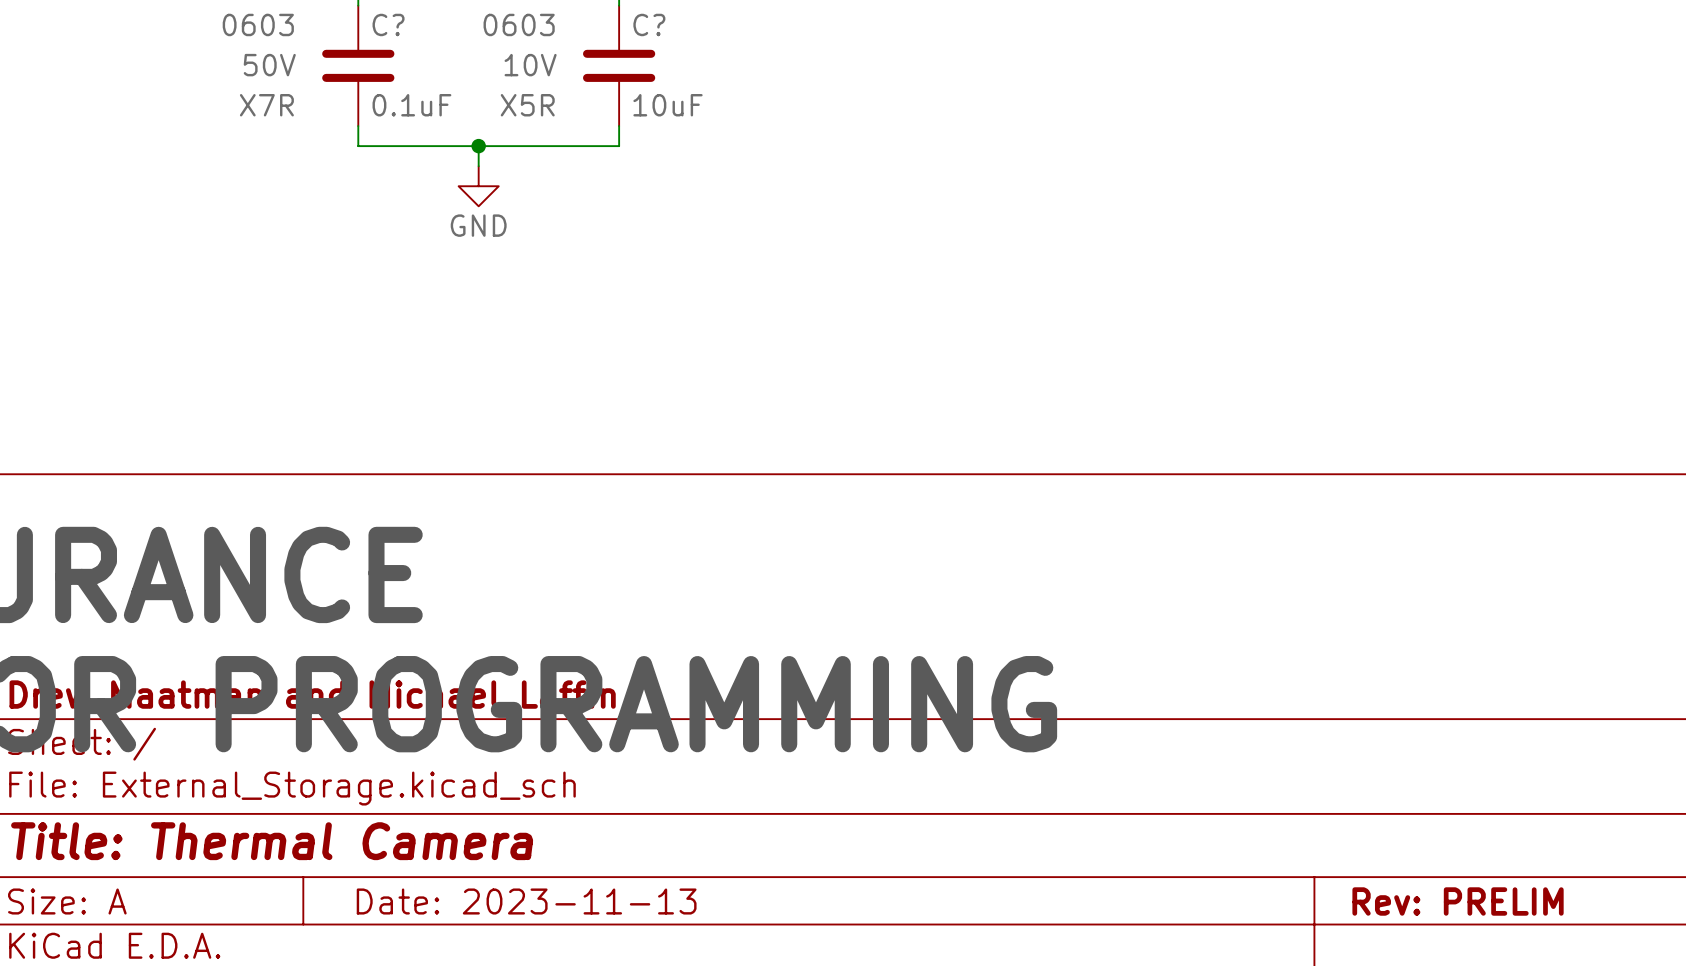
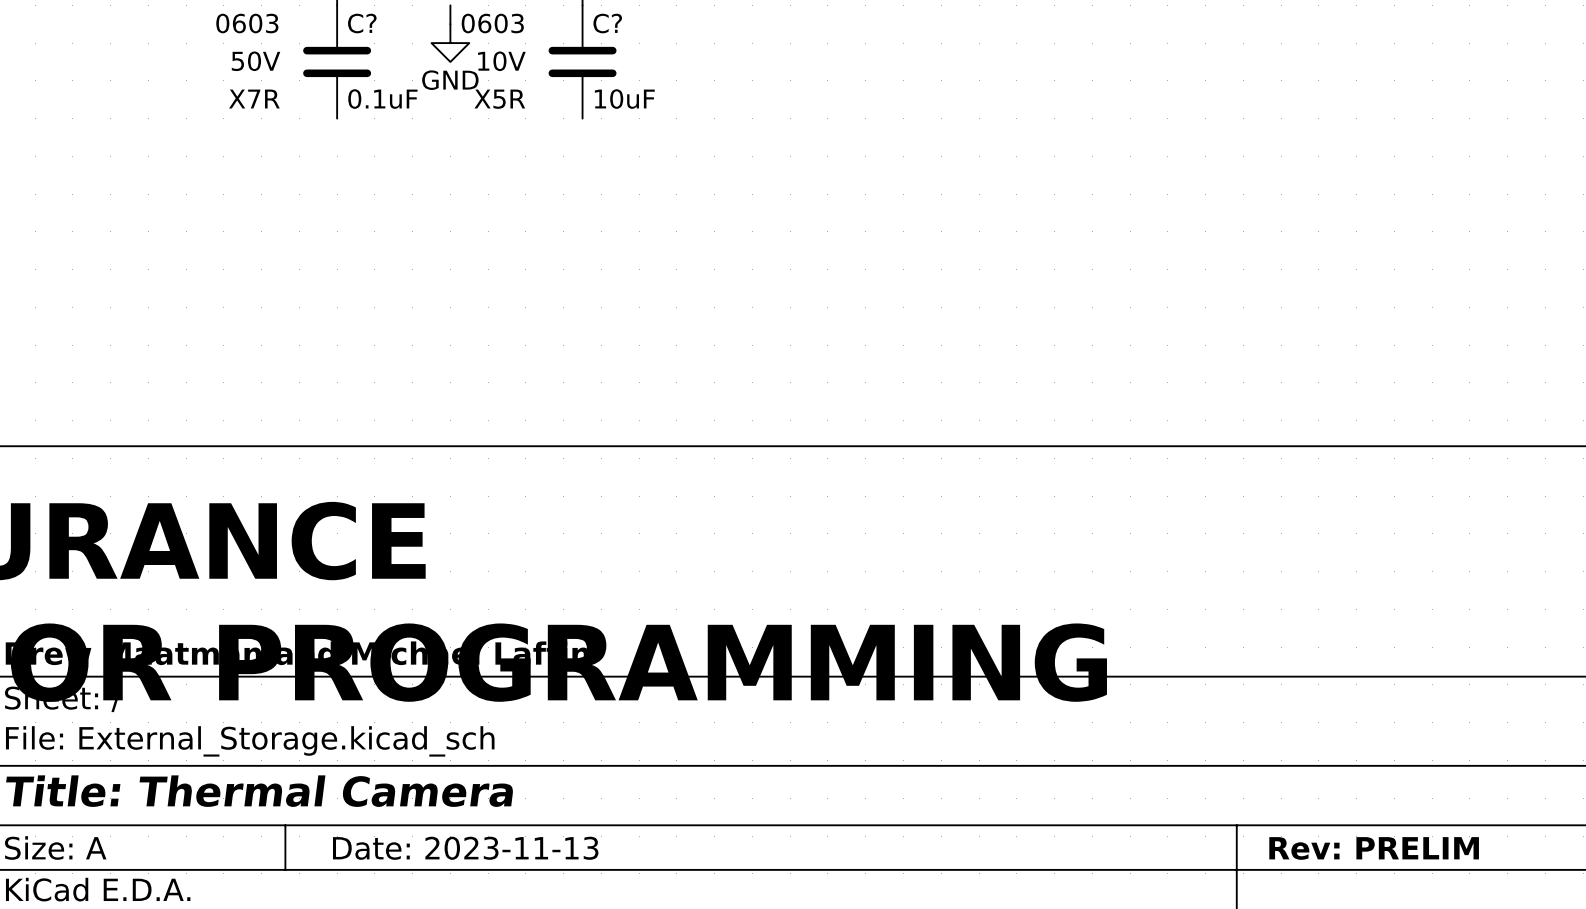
wire: (358, 126) (358, 146) (619, 146) (619, 126) -> none
wire: (478, 146) (478, 166) -> (450, 5) (450, 24)
junction: (478, 146) -> none
power symbol position: GND (478, 186) -> GND (450, 43)

